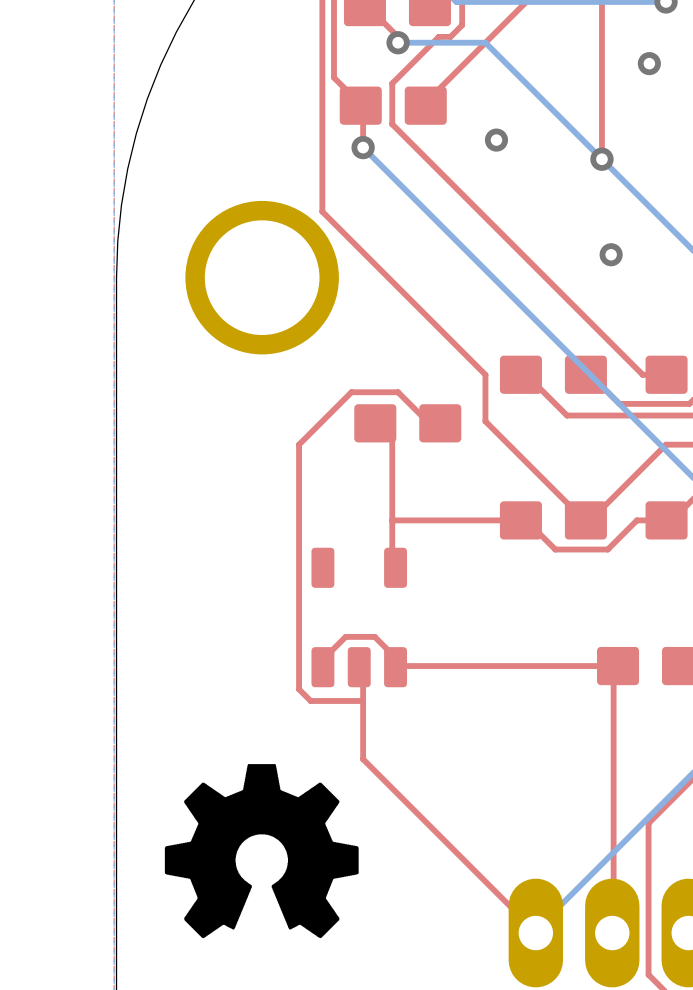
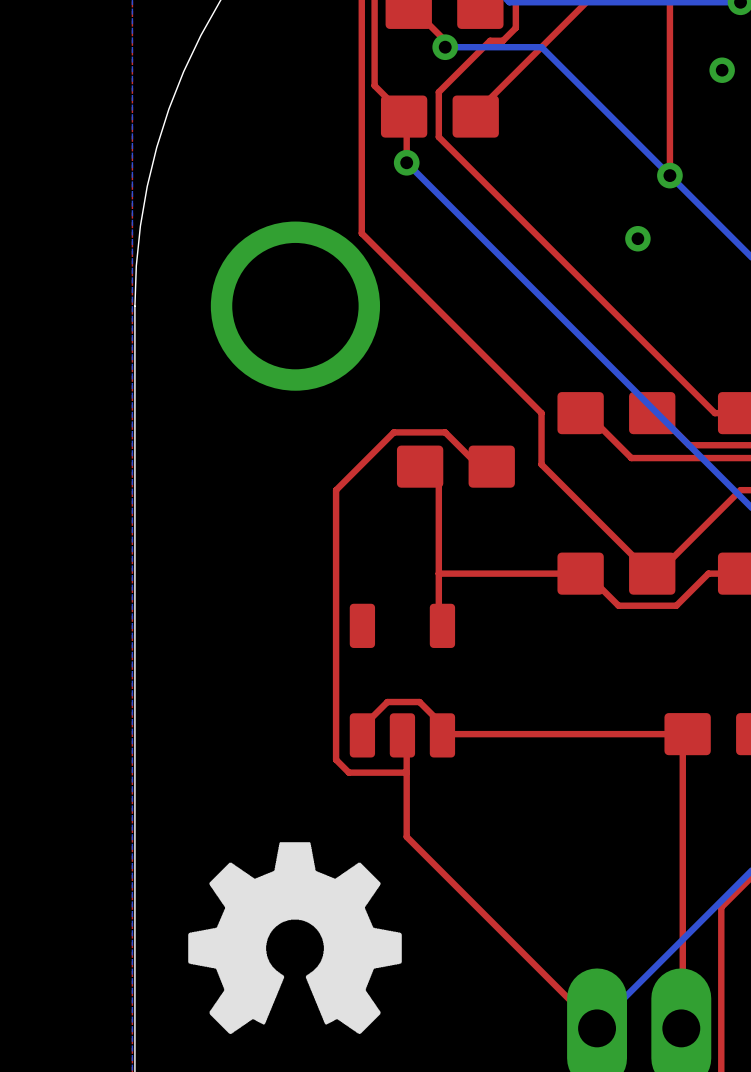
via: (496, 140) -> none
via: none -> (637, 238)
via: (611, 254) -> none

